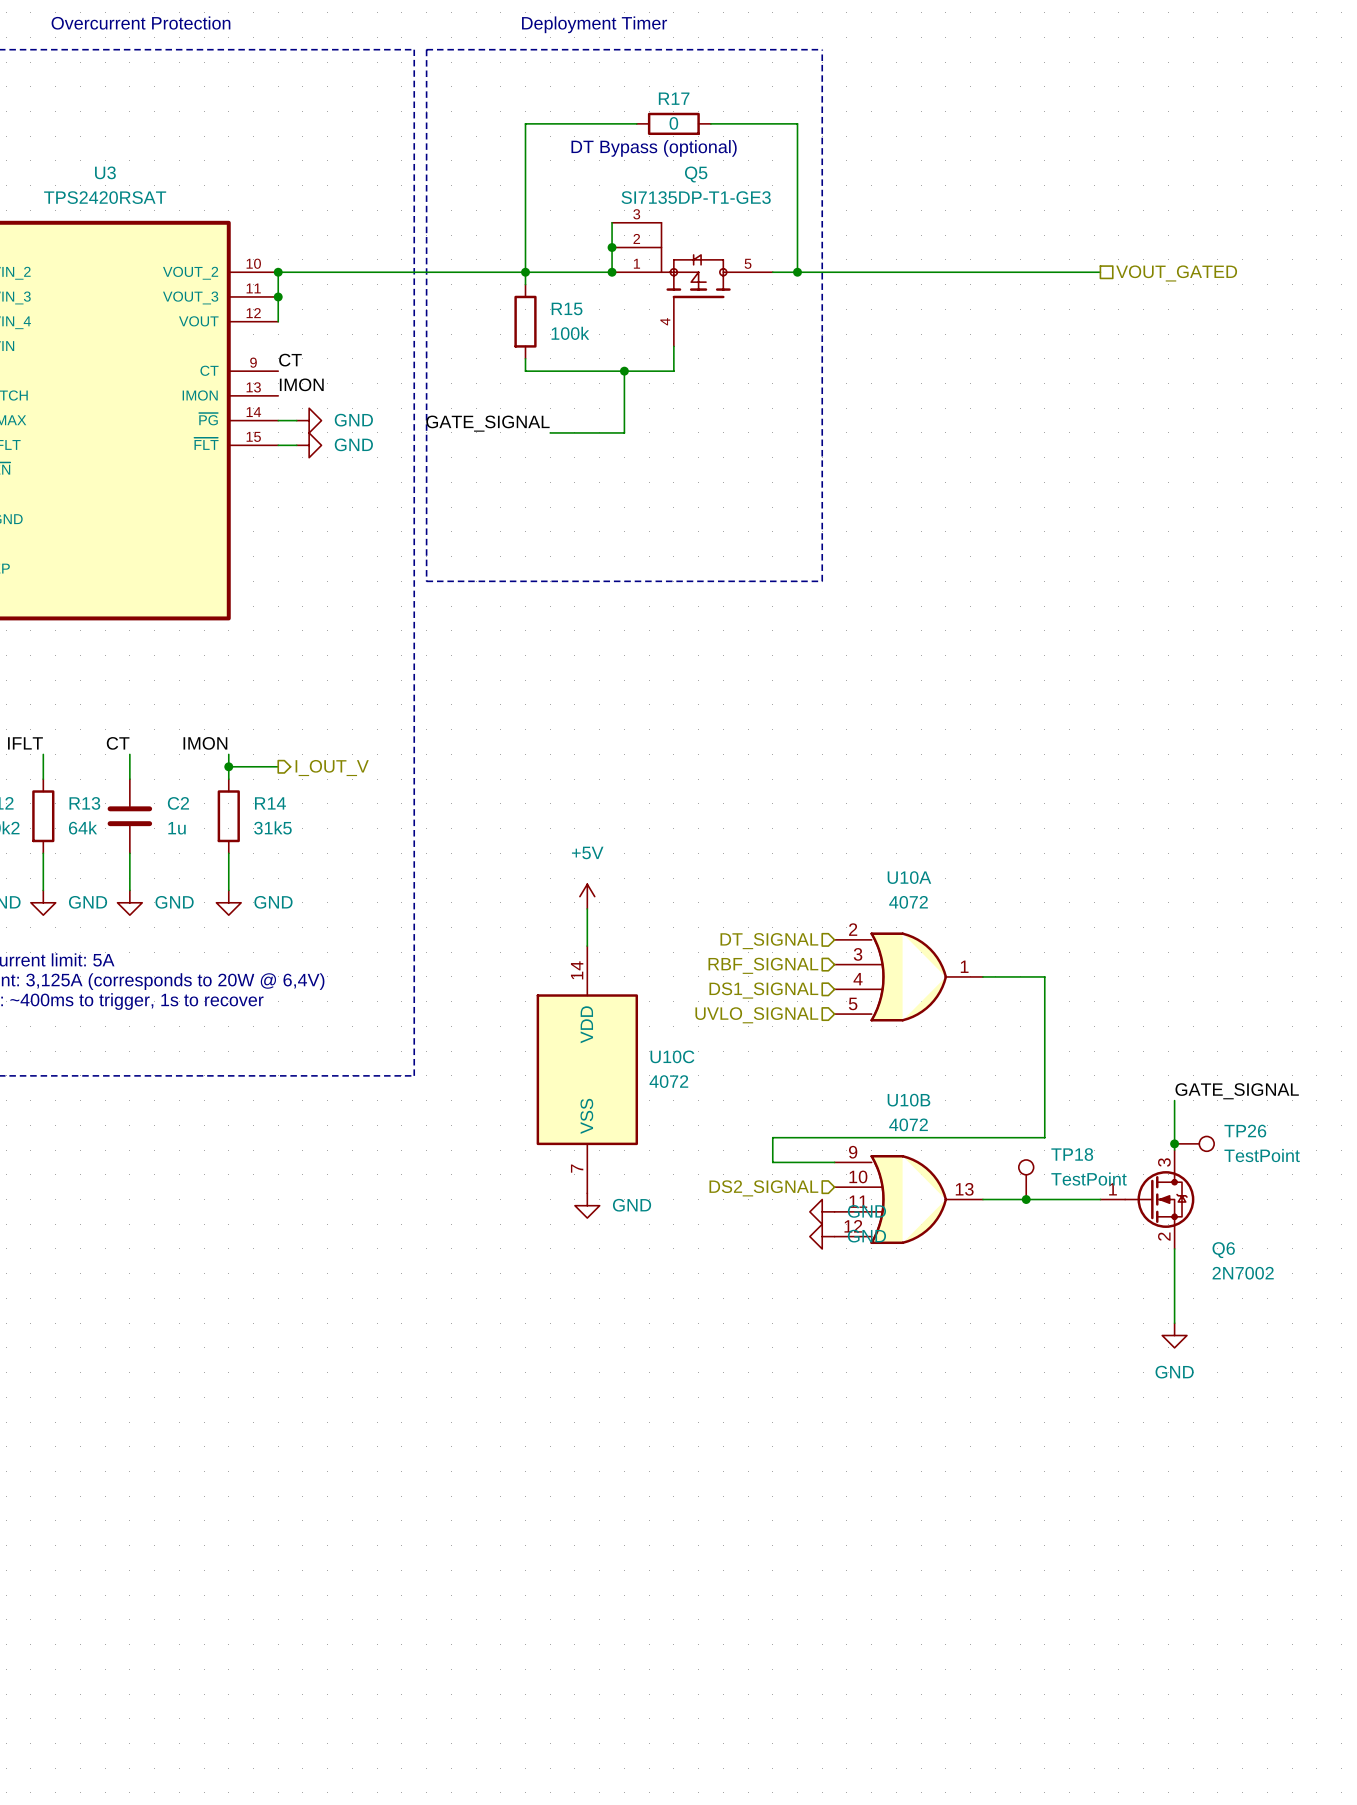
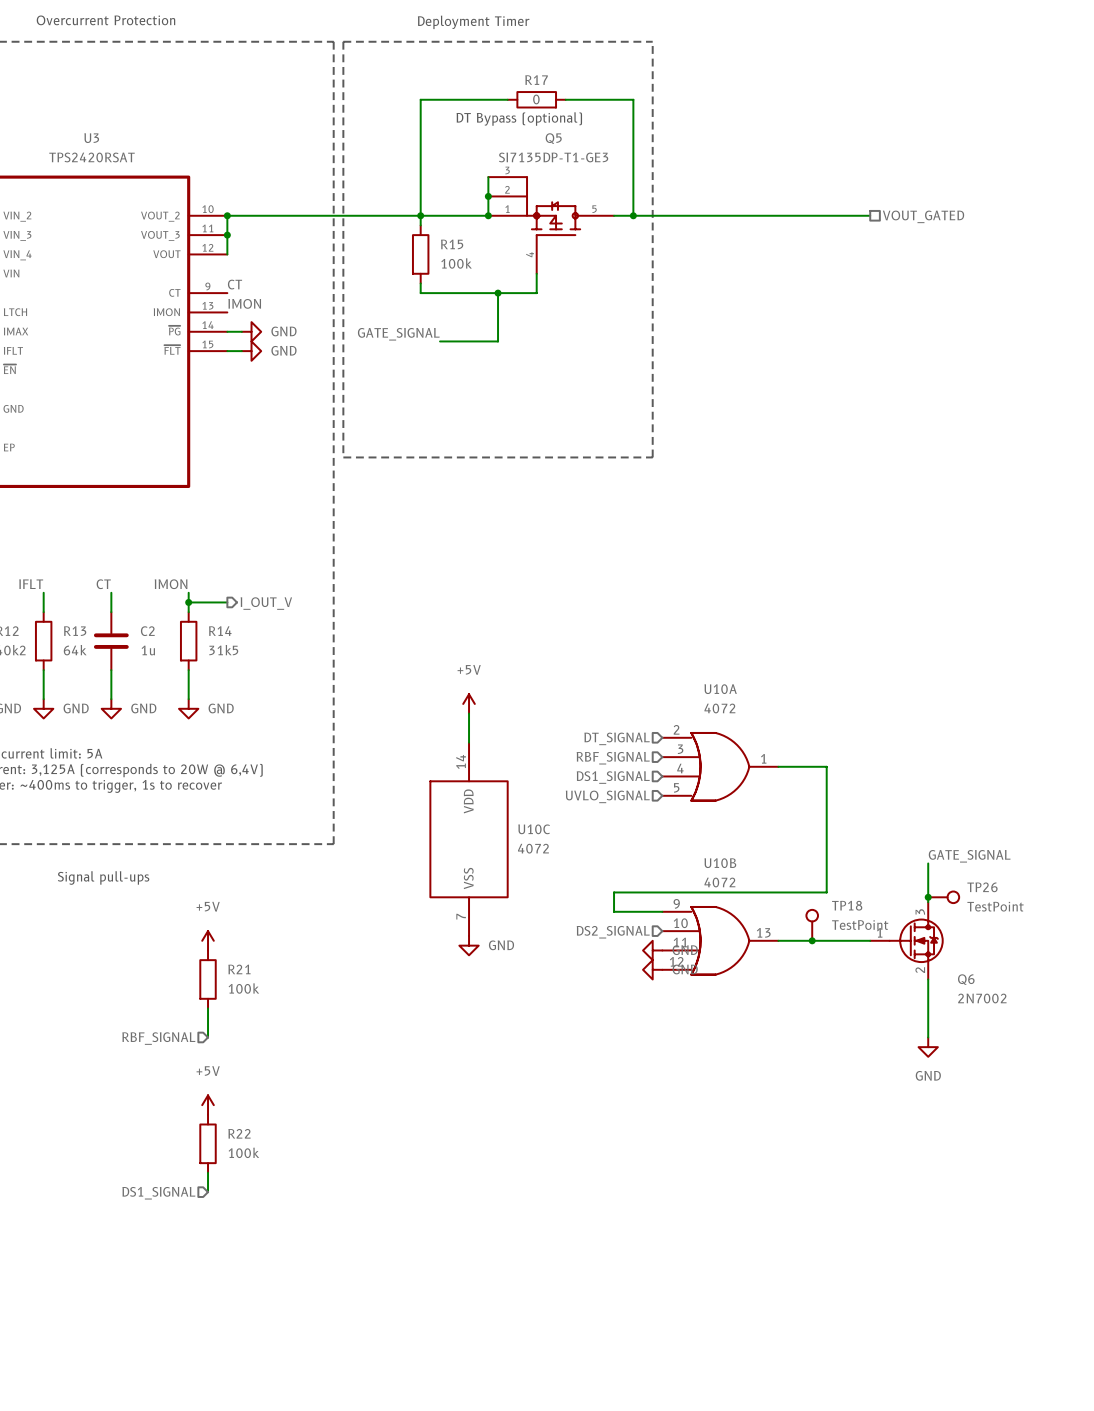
text position: Overcurrent Protection (140, 23) -> Overcurrent Protection (105, 20)
text: none -> Signal pull-ups (103, 878)
power symbol: none -> +5V (208, 940)
R21: none -> 100k (208, 979)
wire: none -> (208, 1008) (208, 1037)
hierarchical label: none -> RBF_SIGNAL (158, 1038)
power symbol: none -> +5V (208, 1105)
R22: none -> 100k (208, 1143)
wire: none -> (208, 1172) (208, 1192)
hierarchical label: none -> DS1_SIGNAL (158, 1193)

